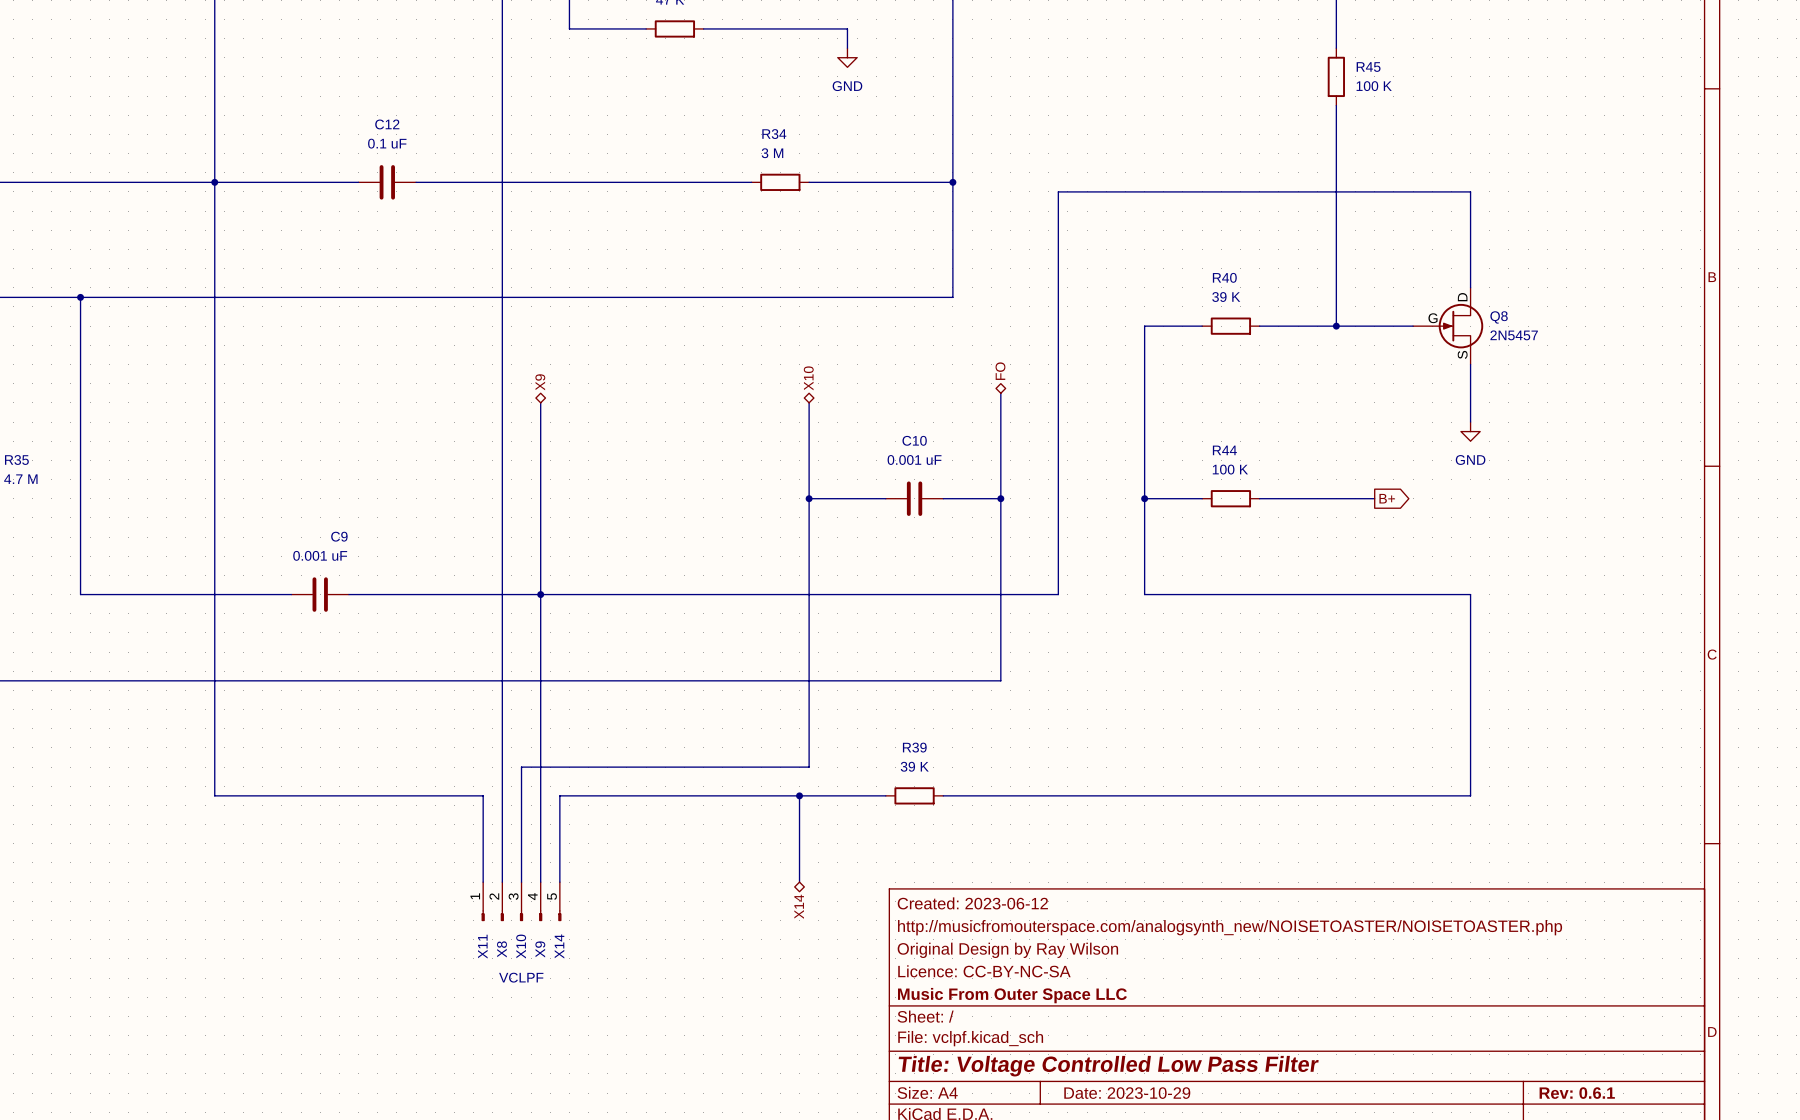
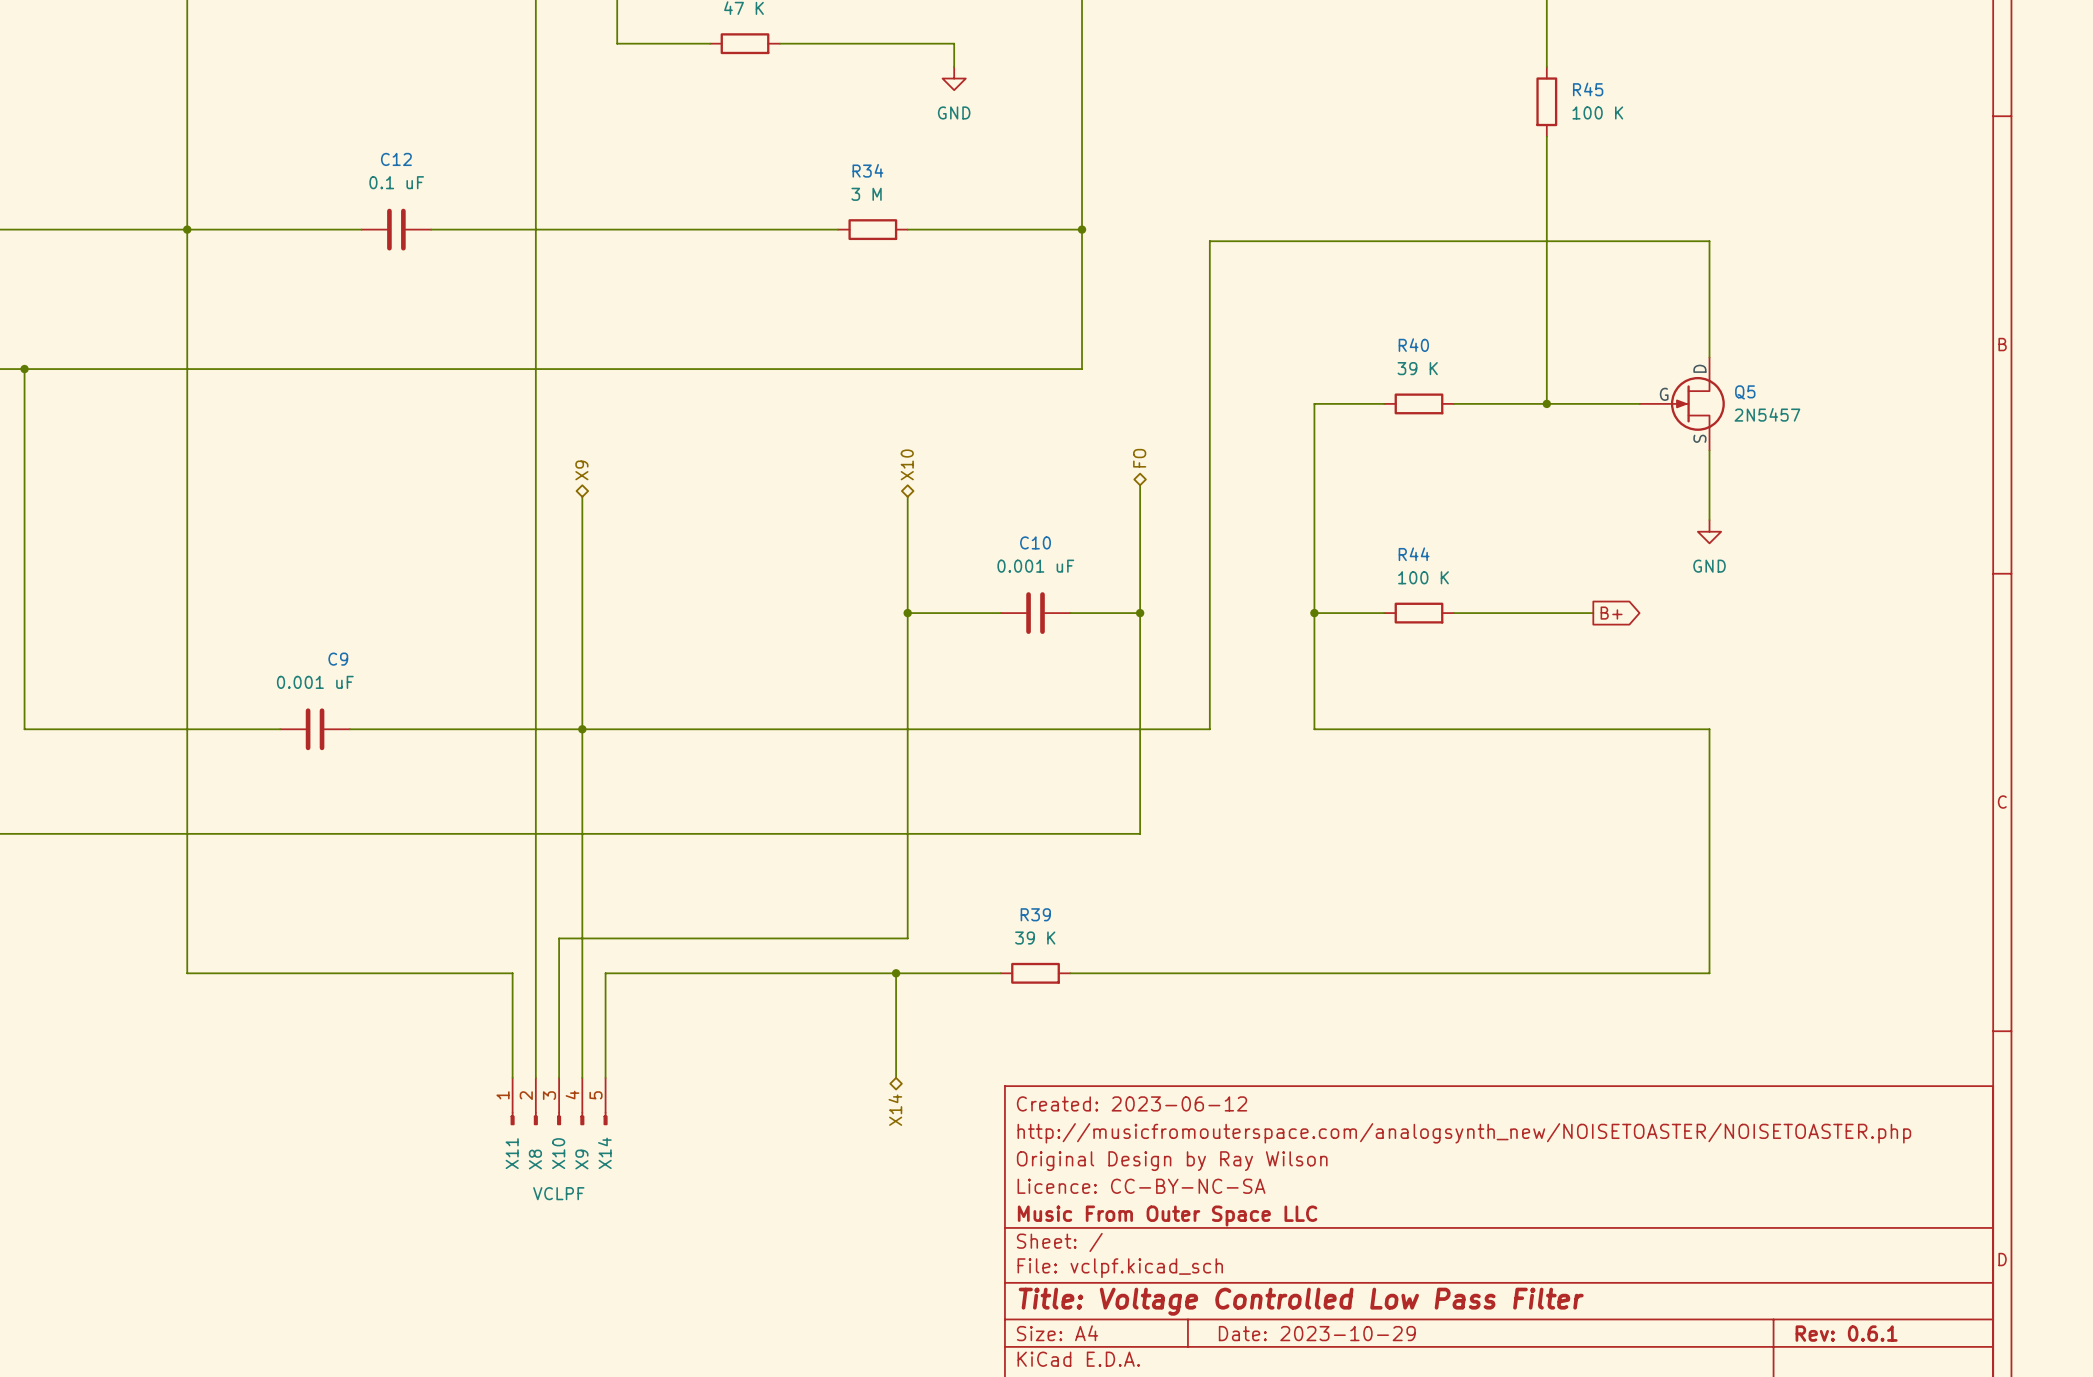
Q8 name: Q8 (1499, 317) -> Q5 (1745, 392)

